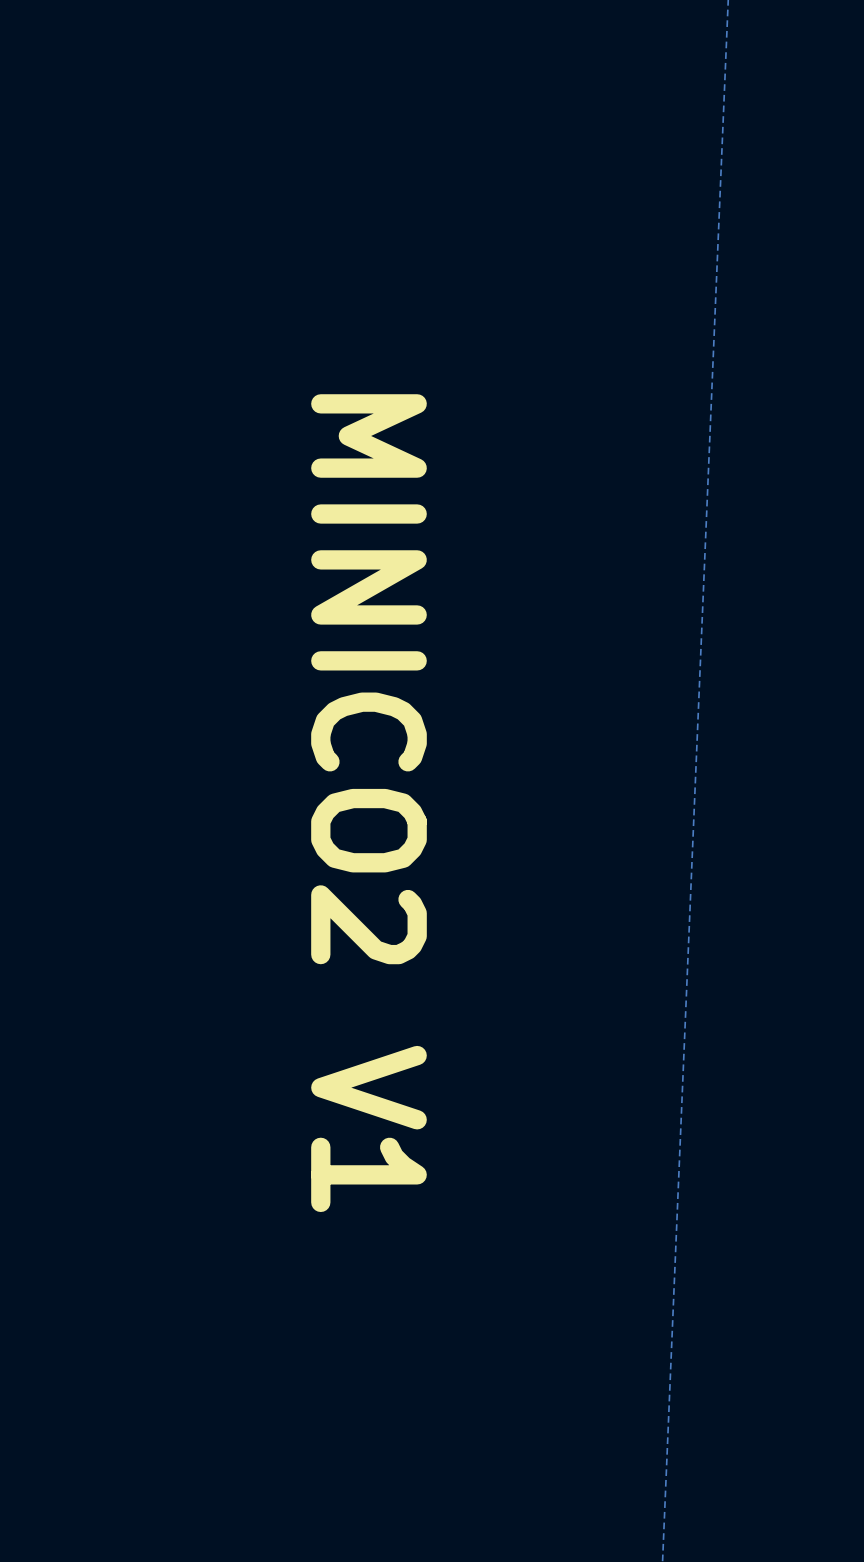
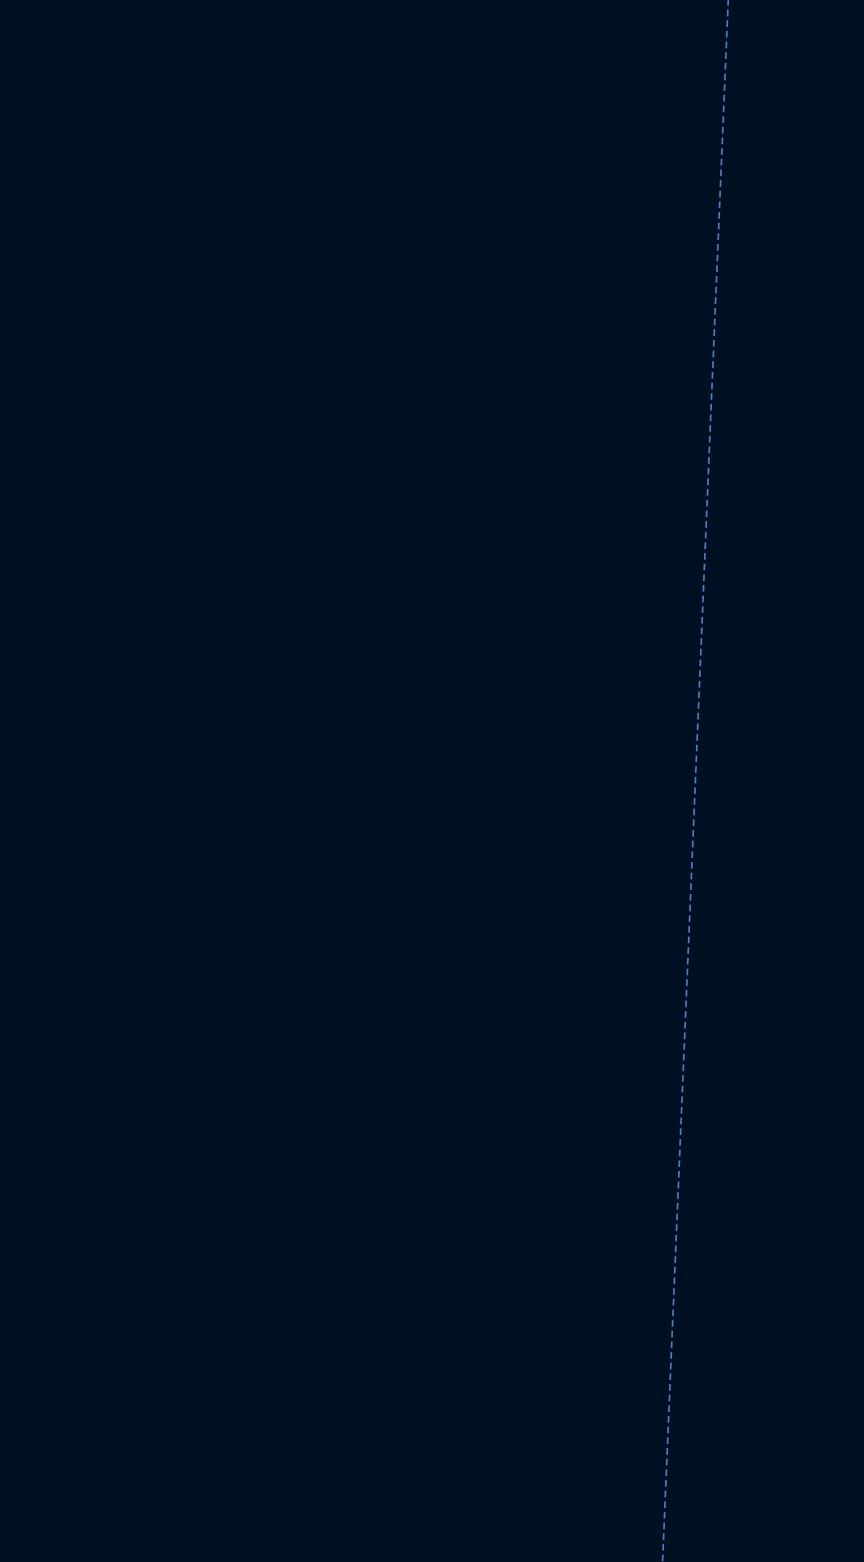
text: MINICO2 V1 (368, 803) -> none

